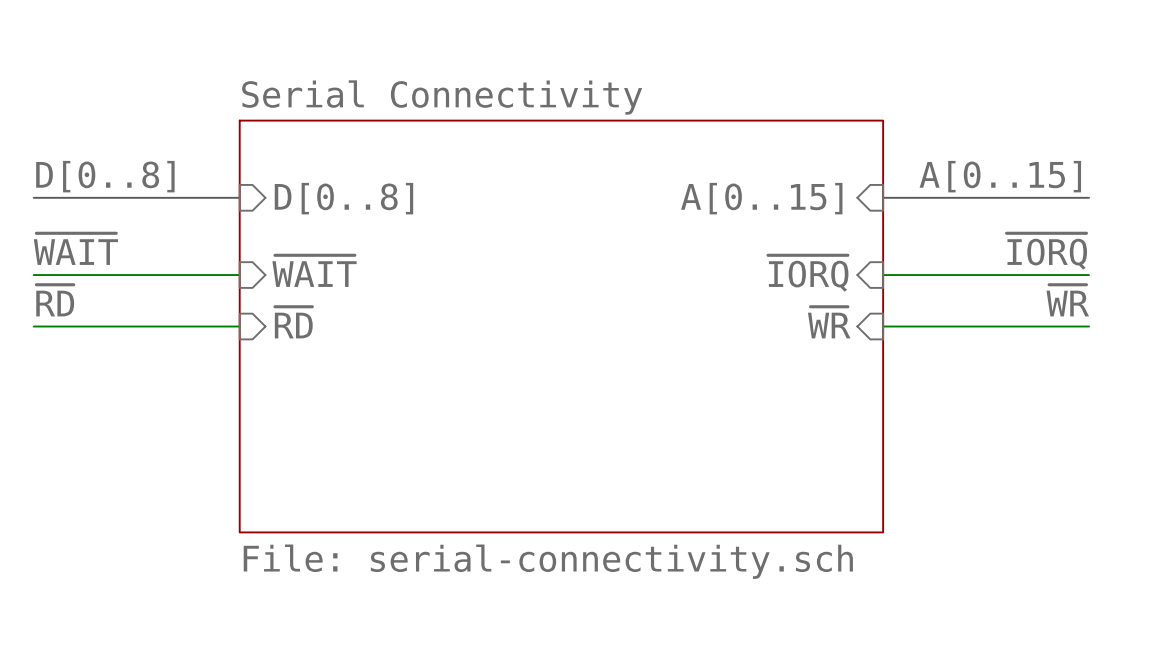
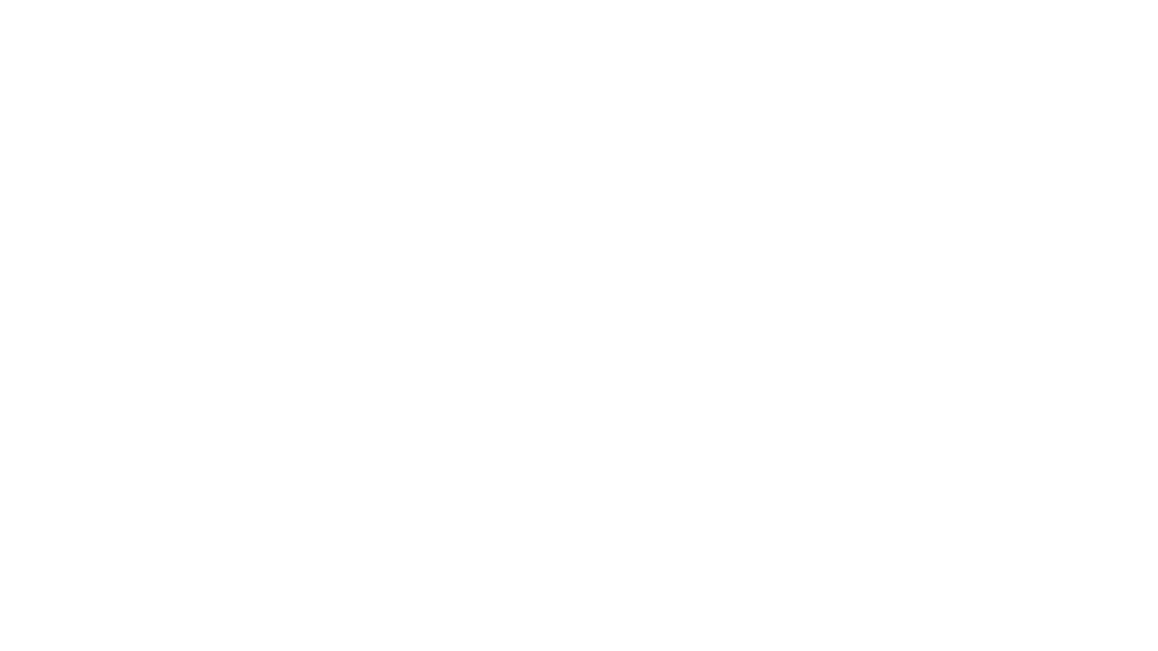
label: D[0..8] (105, 176) -> none
label: A[0..15] (1000, 176) -> none
bus: (33, 197) (239, 197) -> none
bus: (883, 197) (1089, 197) -> none
sheet pin: D[0..8] (343, 198) -> none
sheet pin: A[0..15] (761, 198) -> none
label: ~{WAIT} (75, 249) -> none
label: ~{IORQ} (1046, 251) -> none
sheet pin: ~{WAIT} (314, 271) -> none
sheet pin: ~{IORQ} (808, 273) -> none
wire: (33, 275) (239, 275) -> none
wire: (883, 275) (1089, 275) -> none
label: ~{RD} (55, 300) -> none
label: ~{WR} (1067, 300) -> none
sheet pin: ~{RD} (293, 322) -> none
sheet pin: ~{WR} (829, 322) -> none
wire: (33, 326) (239, 326) -> none
sheet Serial Connectivity: File: serial-connectivity.sch (561, 326) -> none
wire: (883, 326) (1089, 326) -> none

